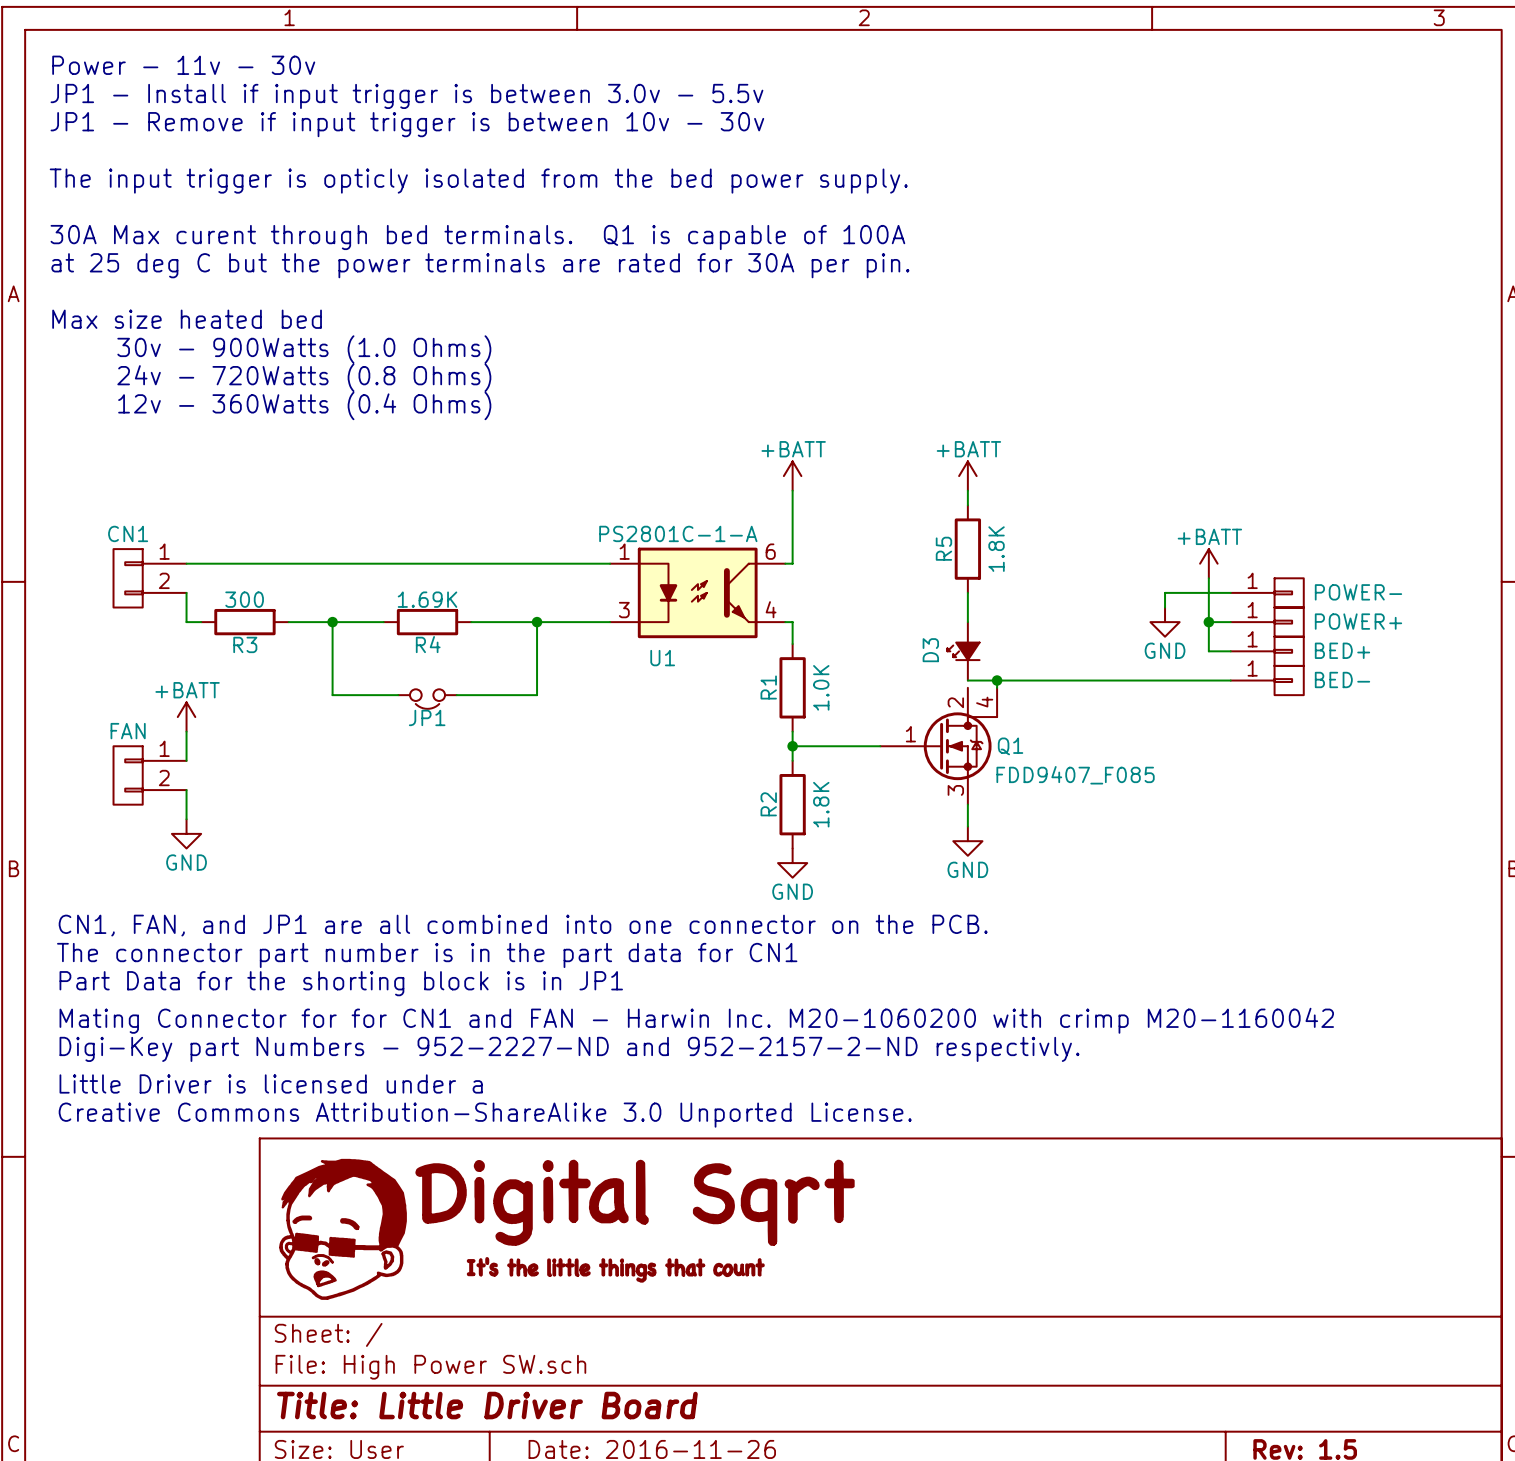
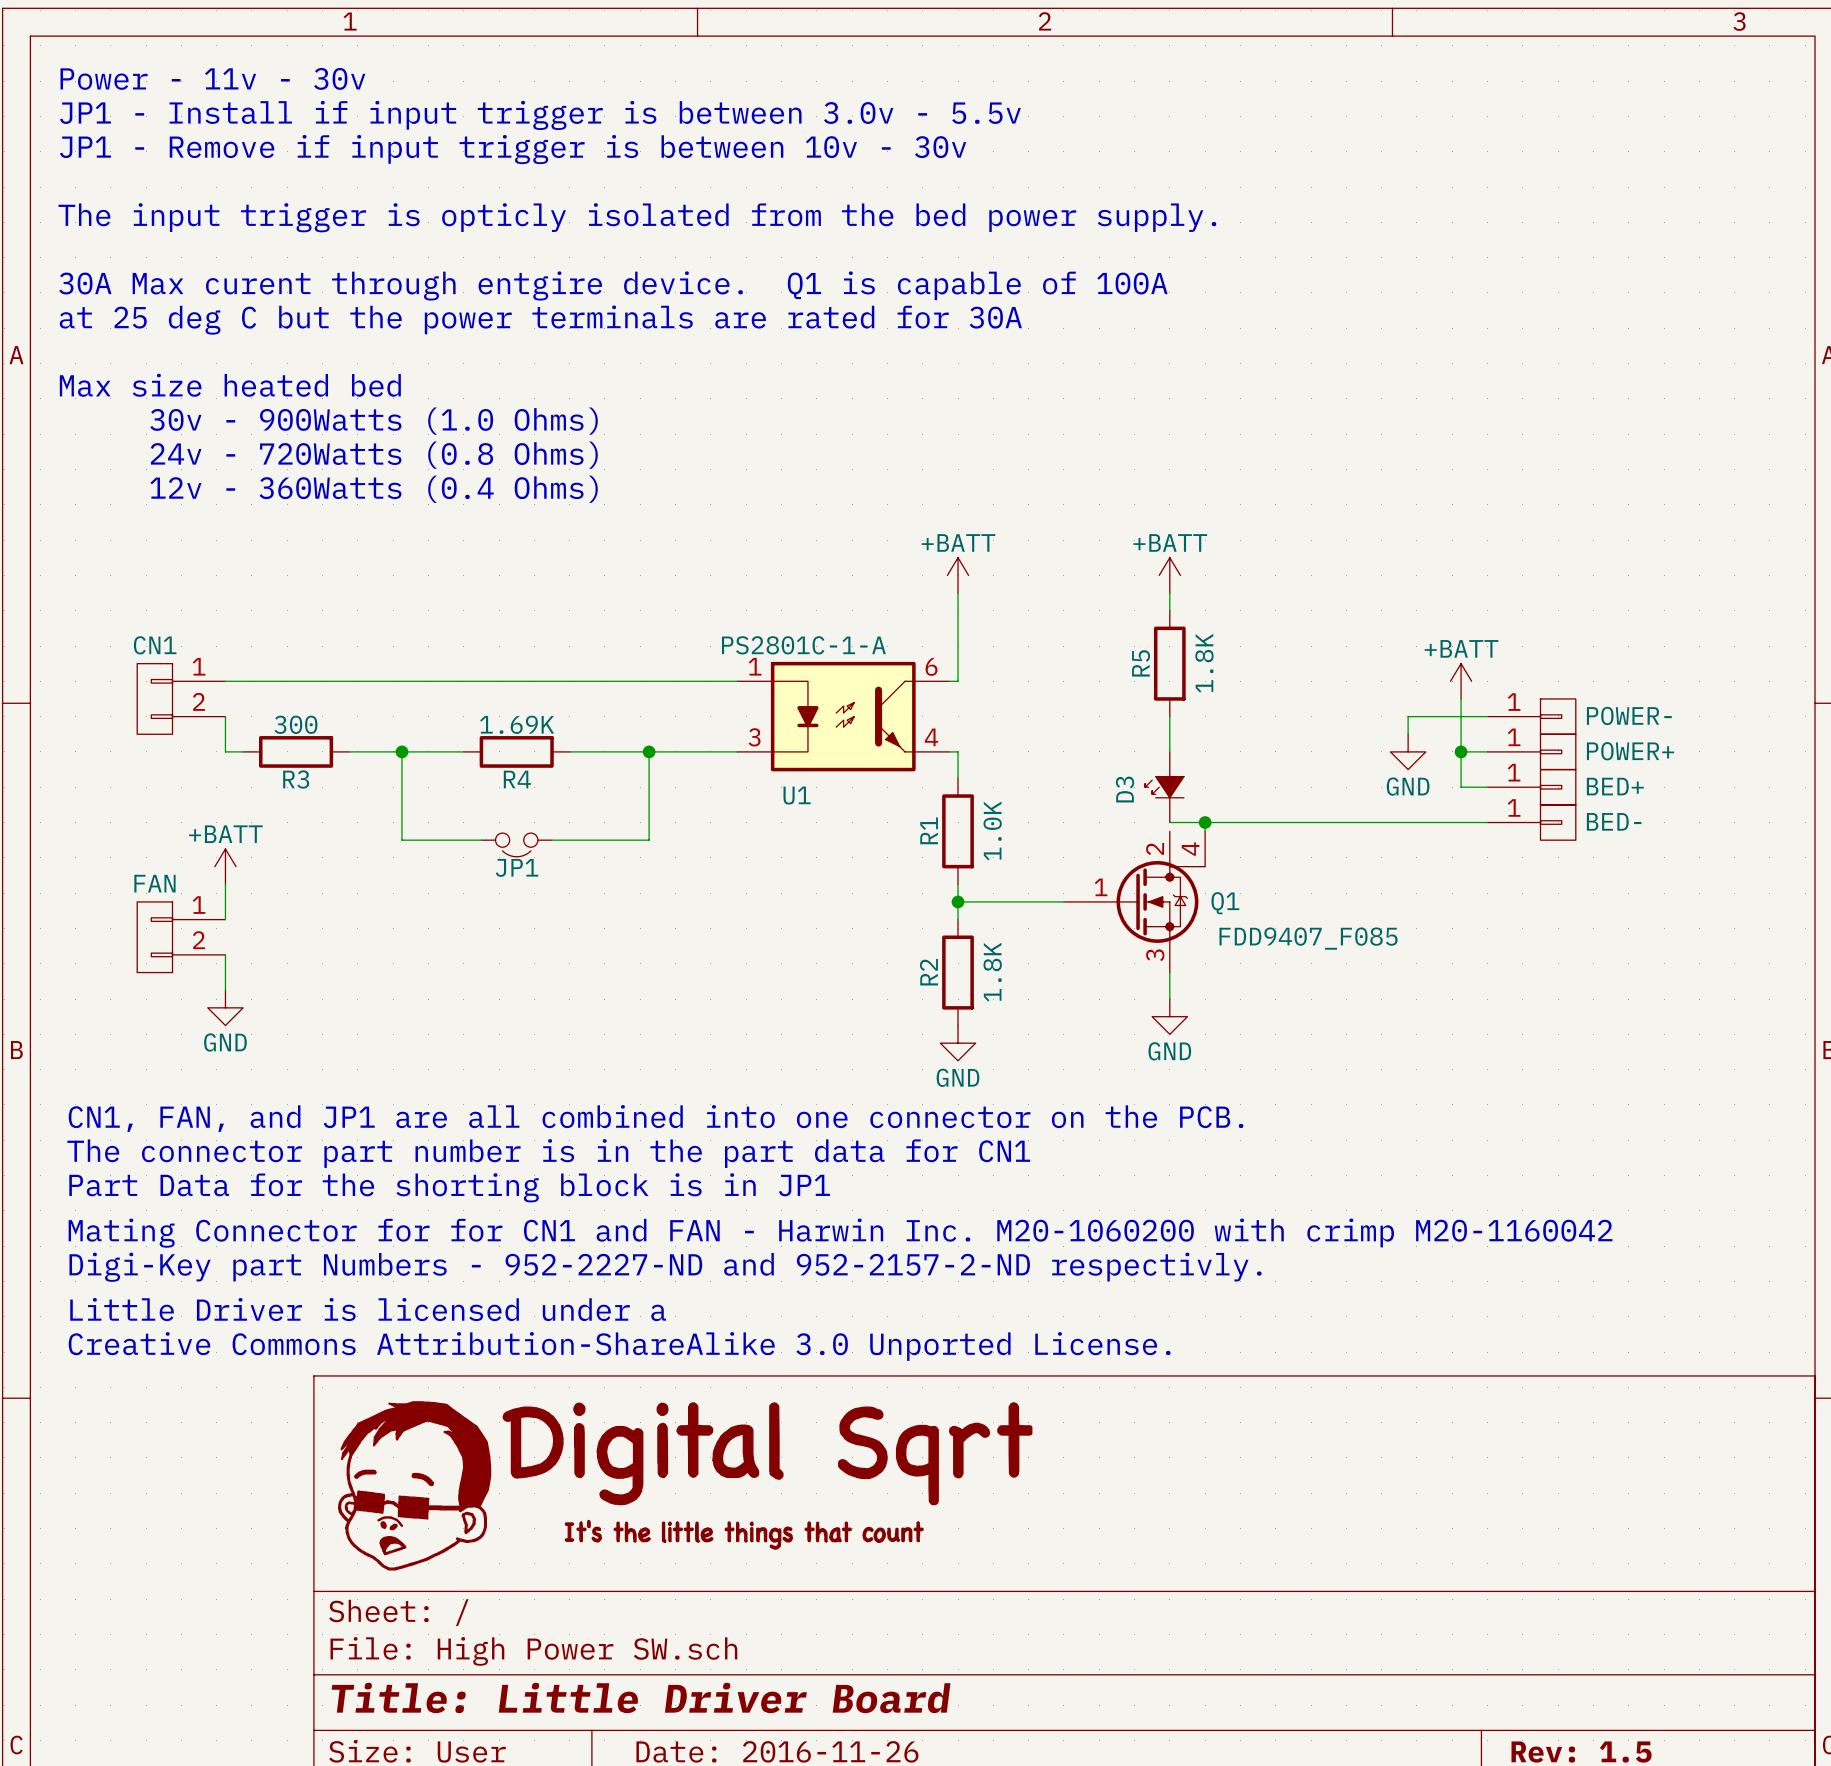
text: 30A Max curent through bed terminals. Q1 is capable of 100A (477, 237) -> 30A Max curent through entgire device. Q1 is capable of 100A (613, 285)
text: at 25 deg C but the power terminals are rated for 30A per pin. (480, 265) -> at 25 deg C but the power terminals are rated for 30A (540, 320)

